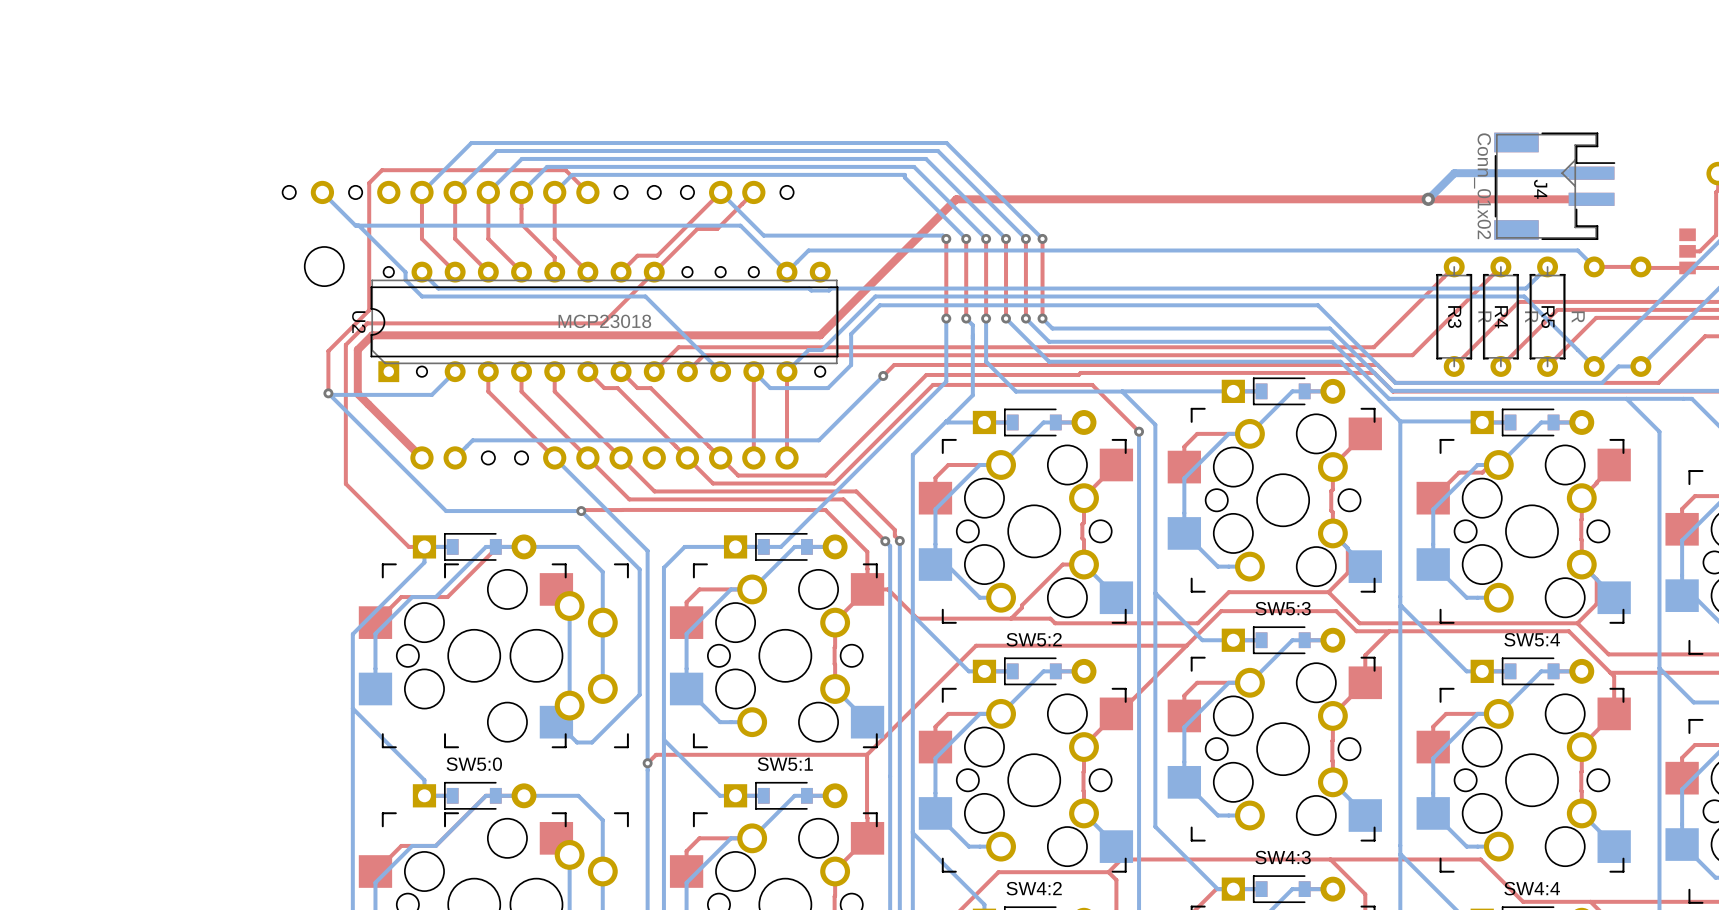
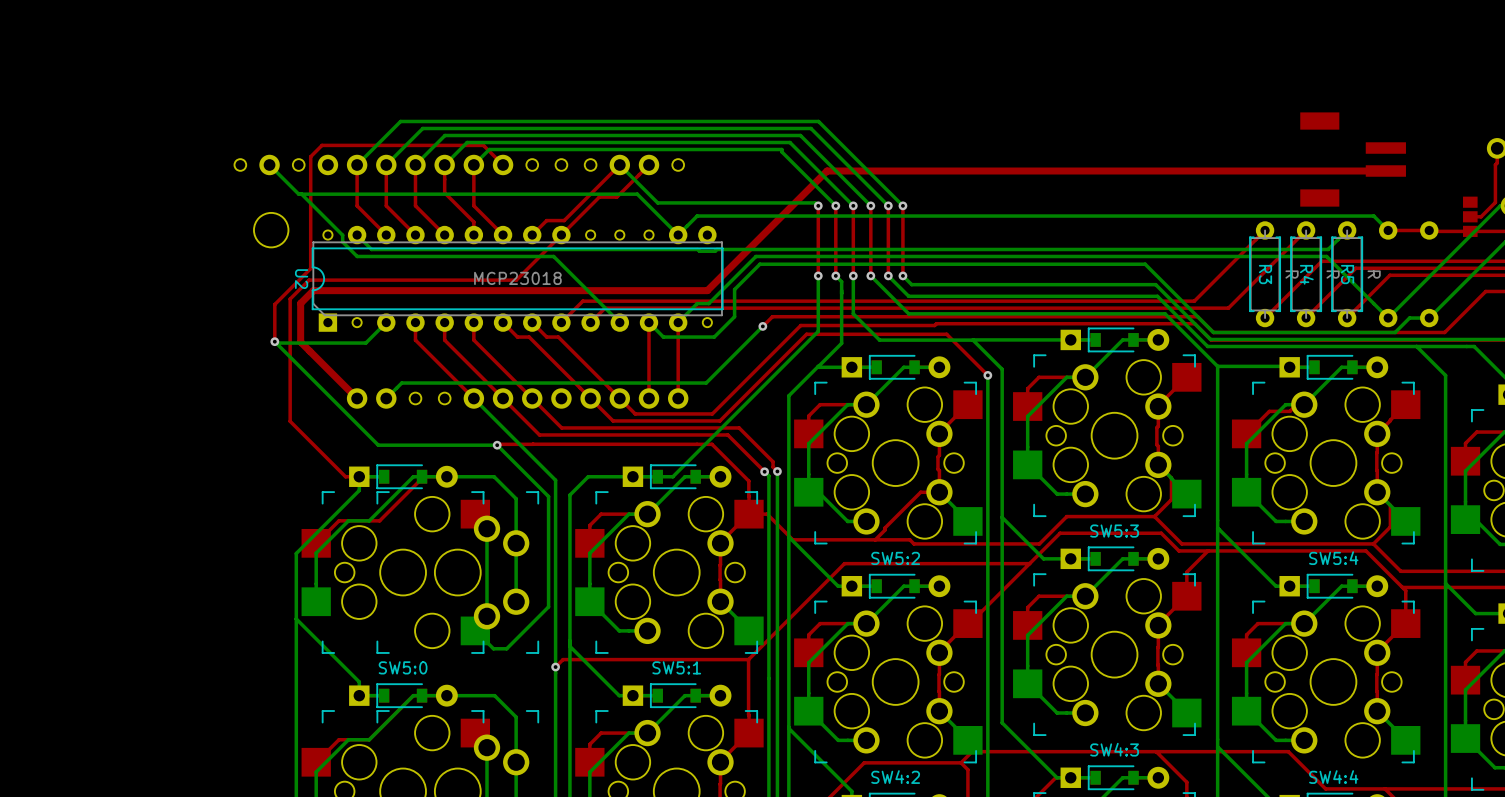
bottom track: (1591, 173) (1454, 173) (1428, 199) -> none
J4: Conn_01x02 (1554, 186) -> none
via: (1428, 199) -> none

